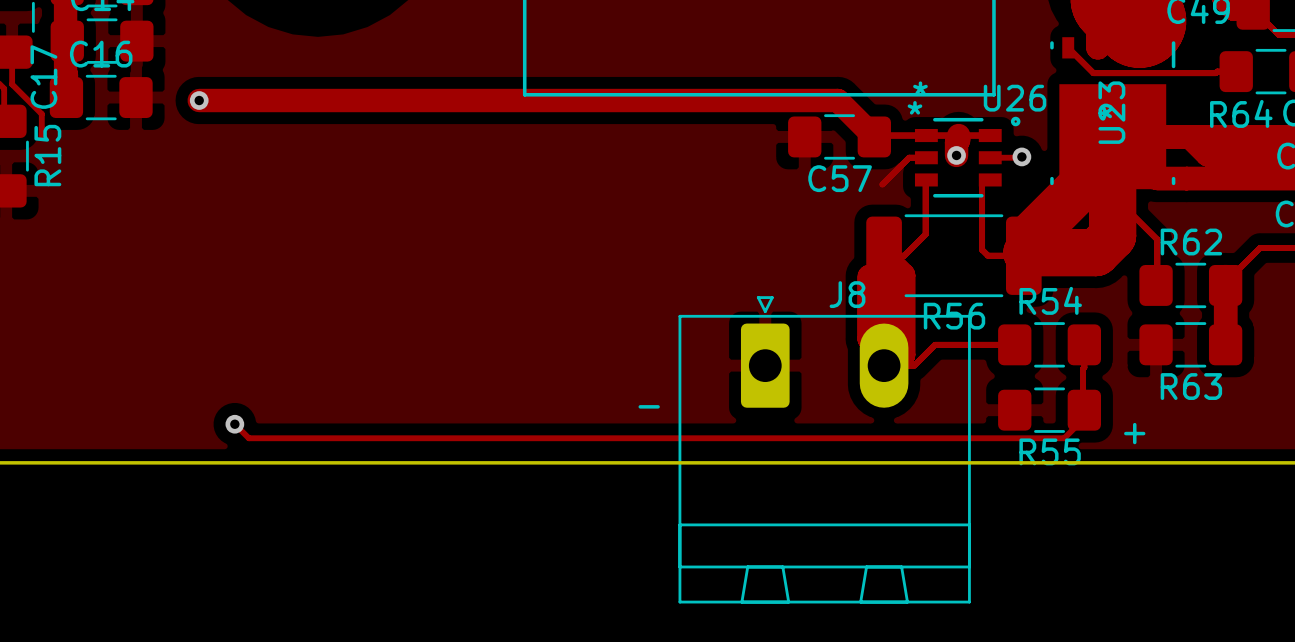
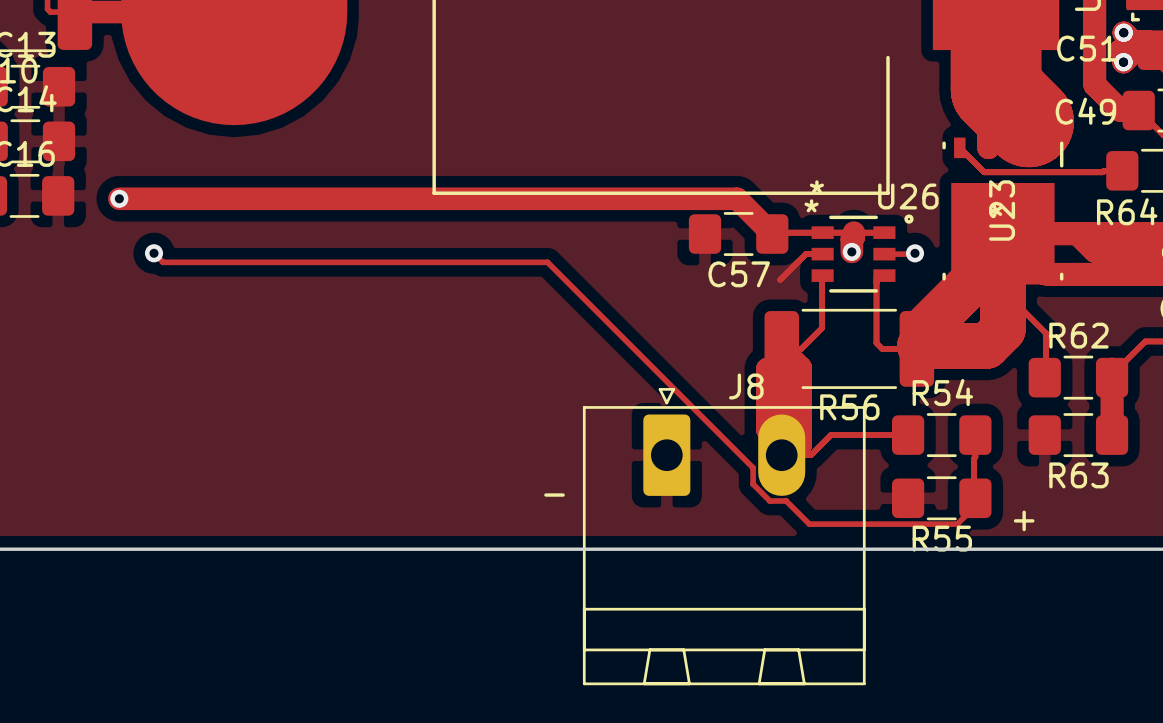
via: none -> (154, 253)
track: (234, 424) (248, 438) (1065, 436) -> (154, 253) (163, 262) (547, 262) (753, 467) (753, 484) (769, 500) (786, 500) (809, 524) (957, 524)
via: (234, 424) -> none

